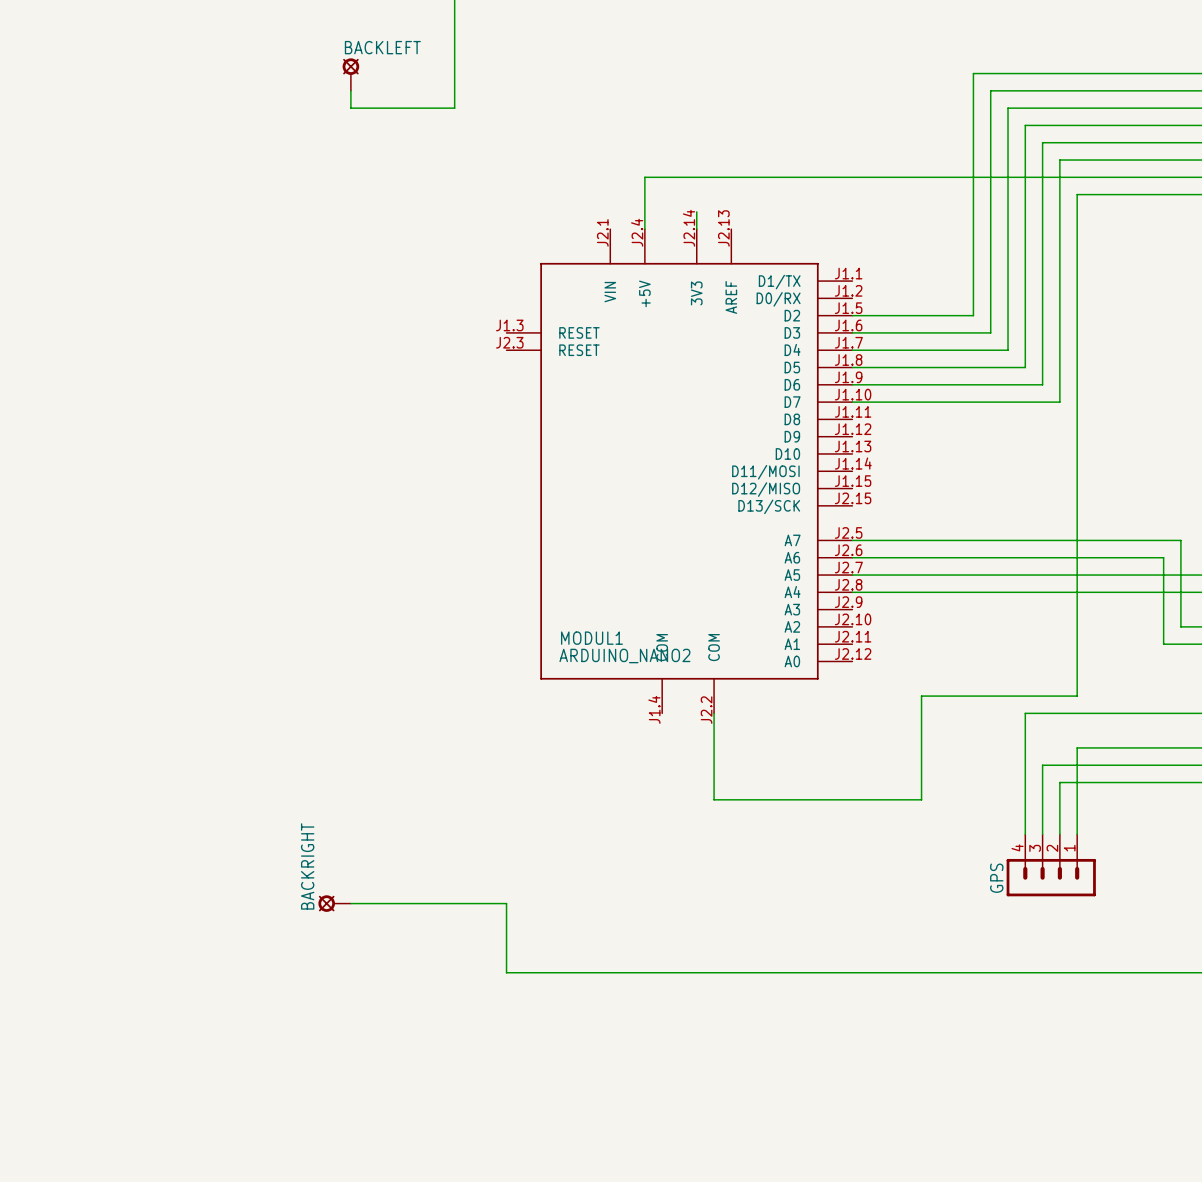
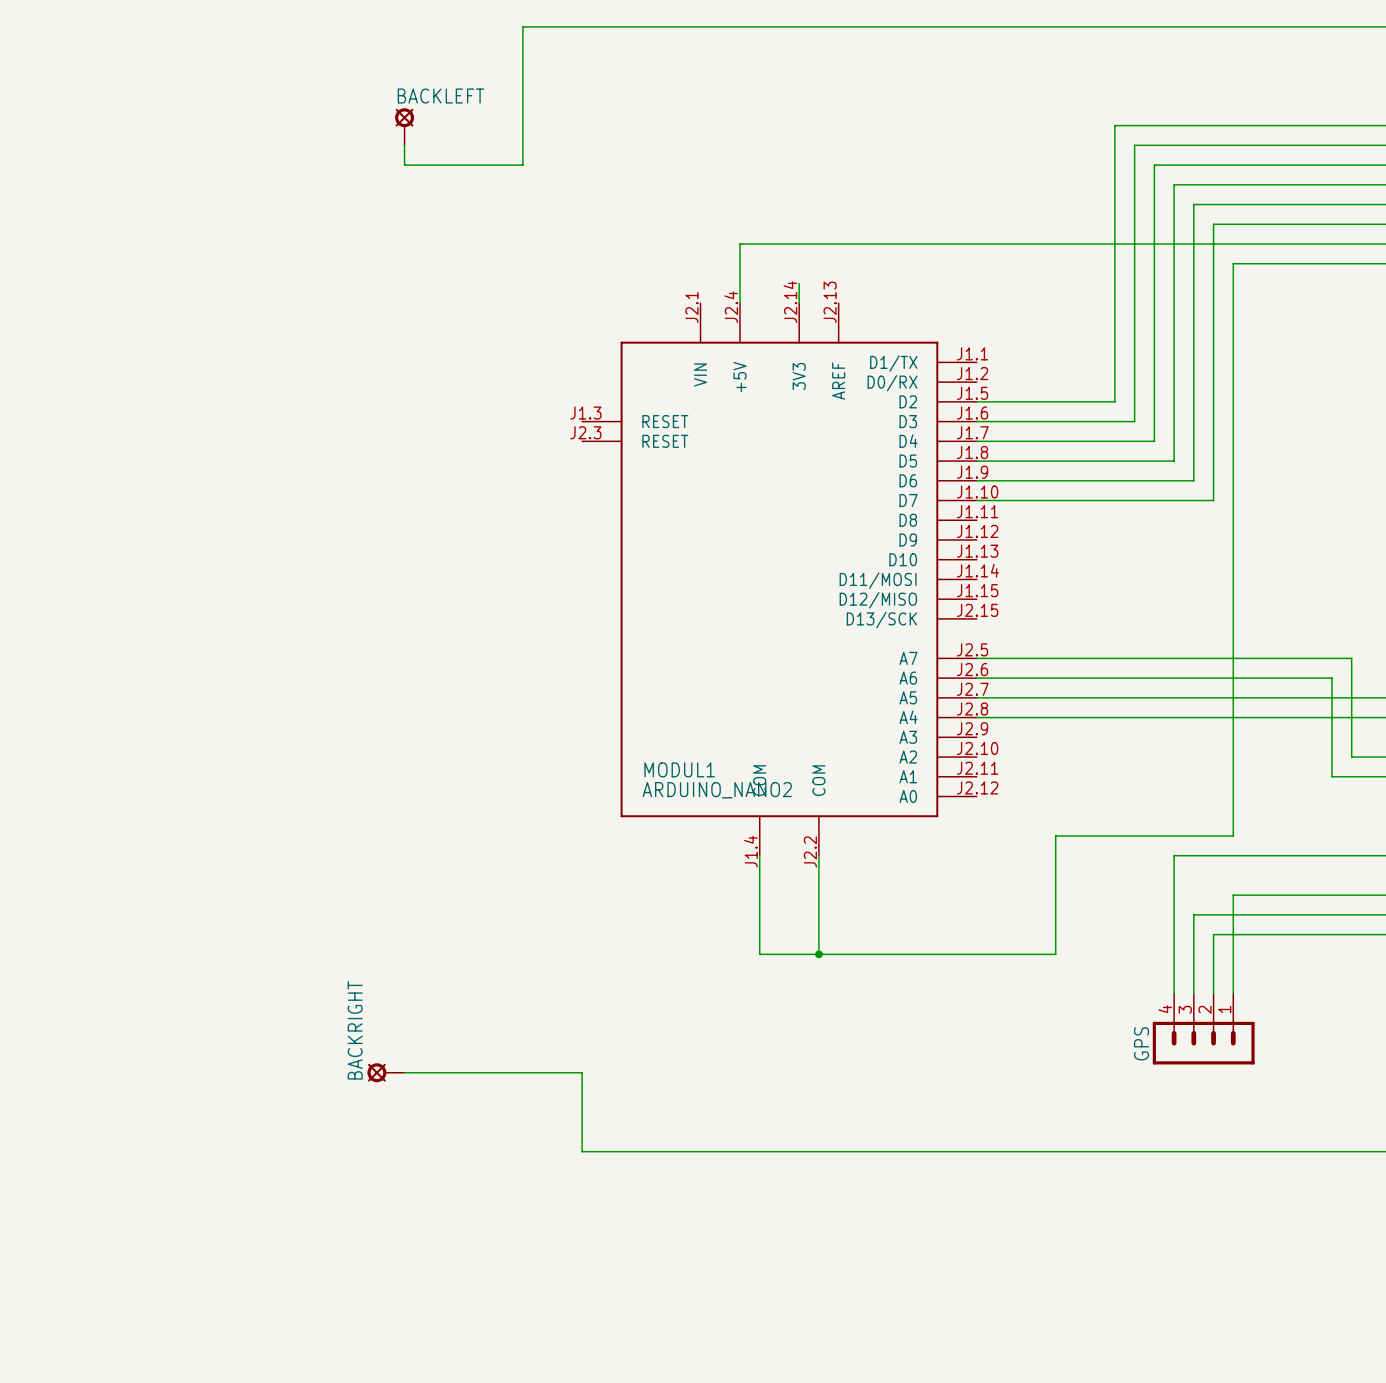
wire: none -> (759, 855) (759, 954) (818, 954)
junction: none -> (818, 954)

